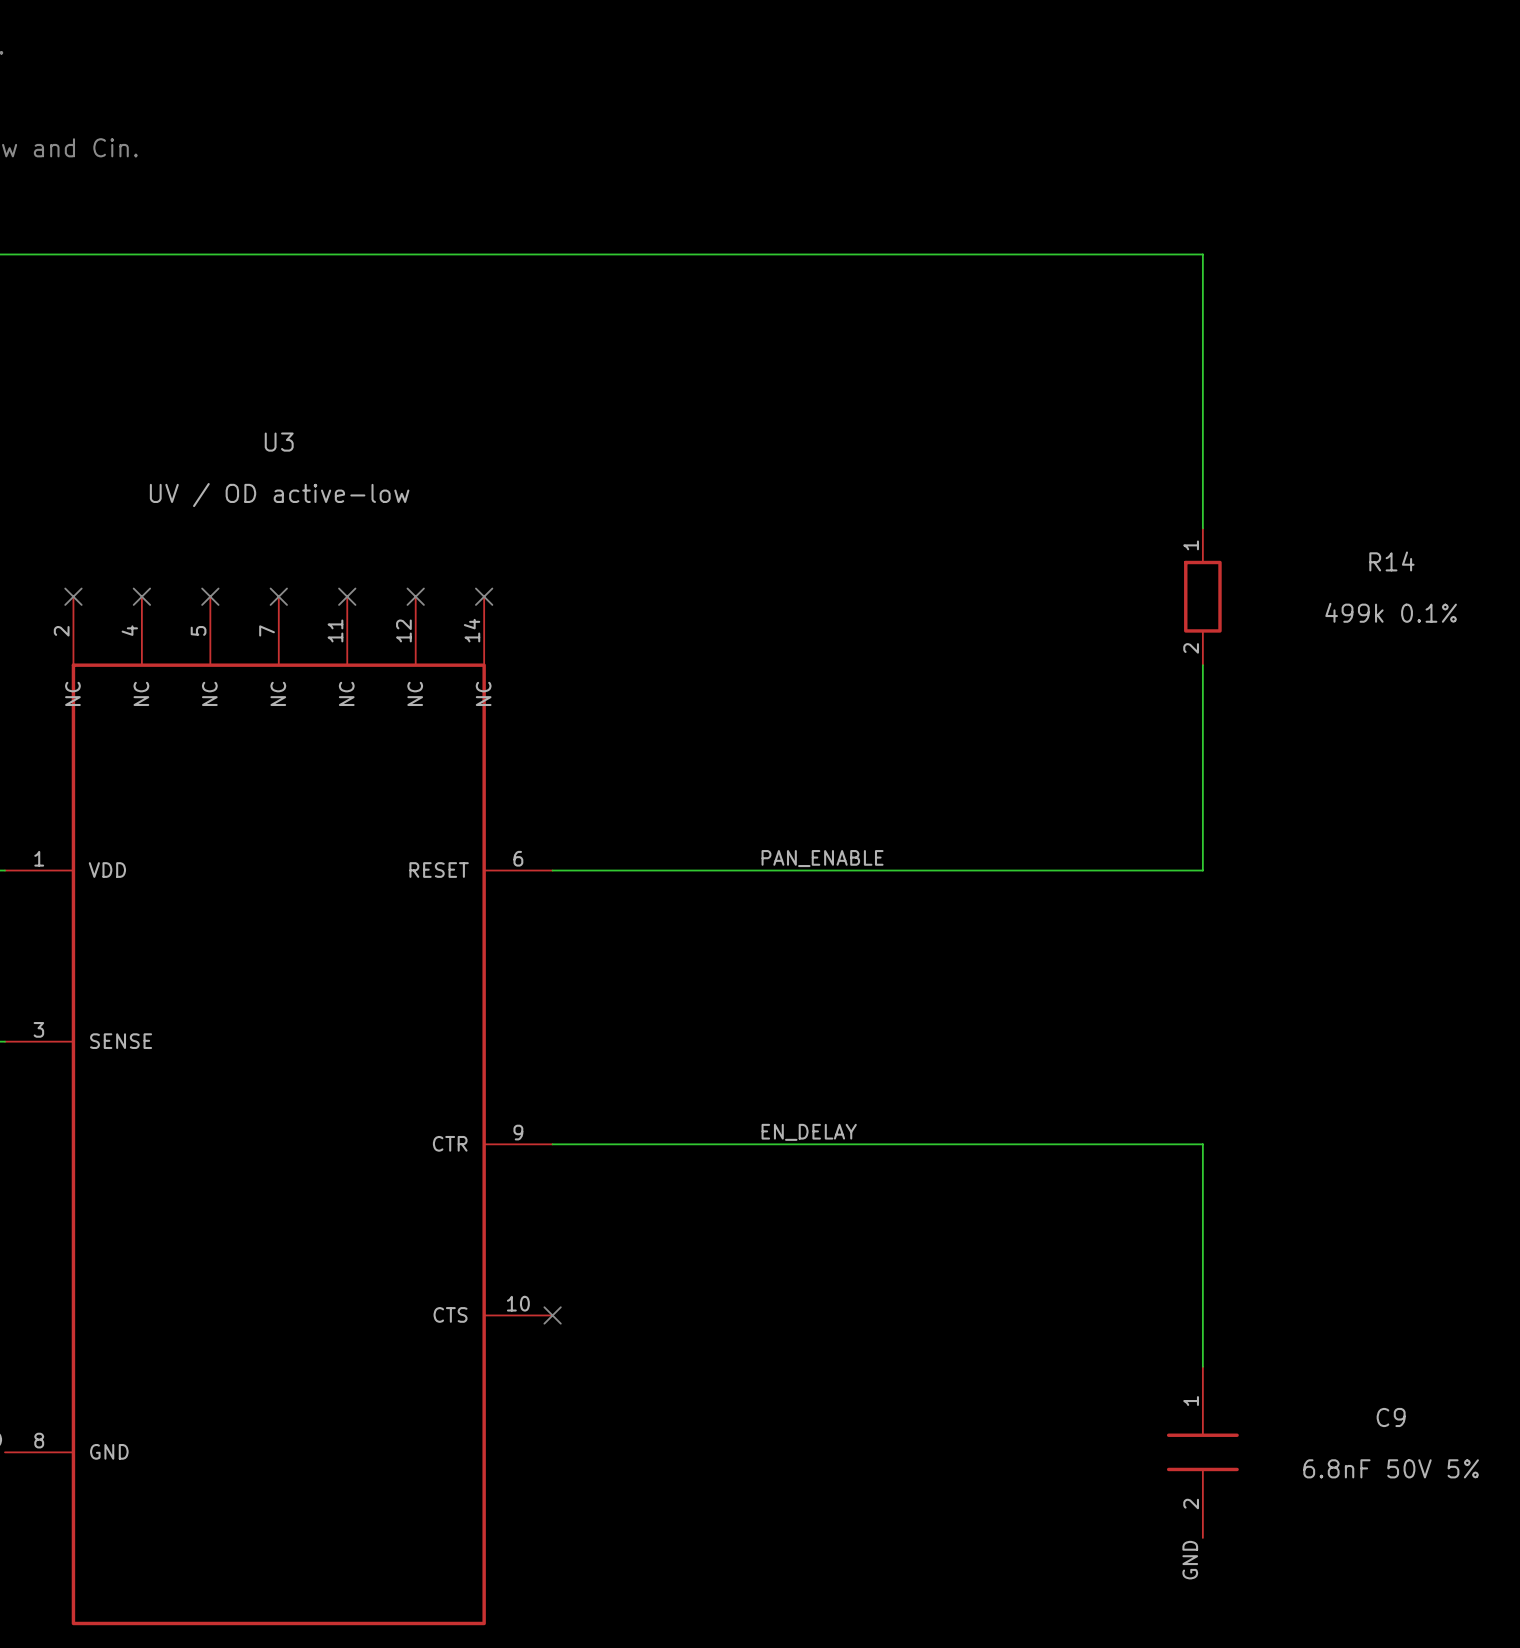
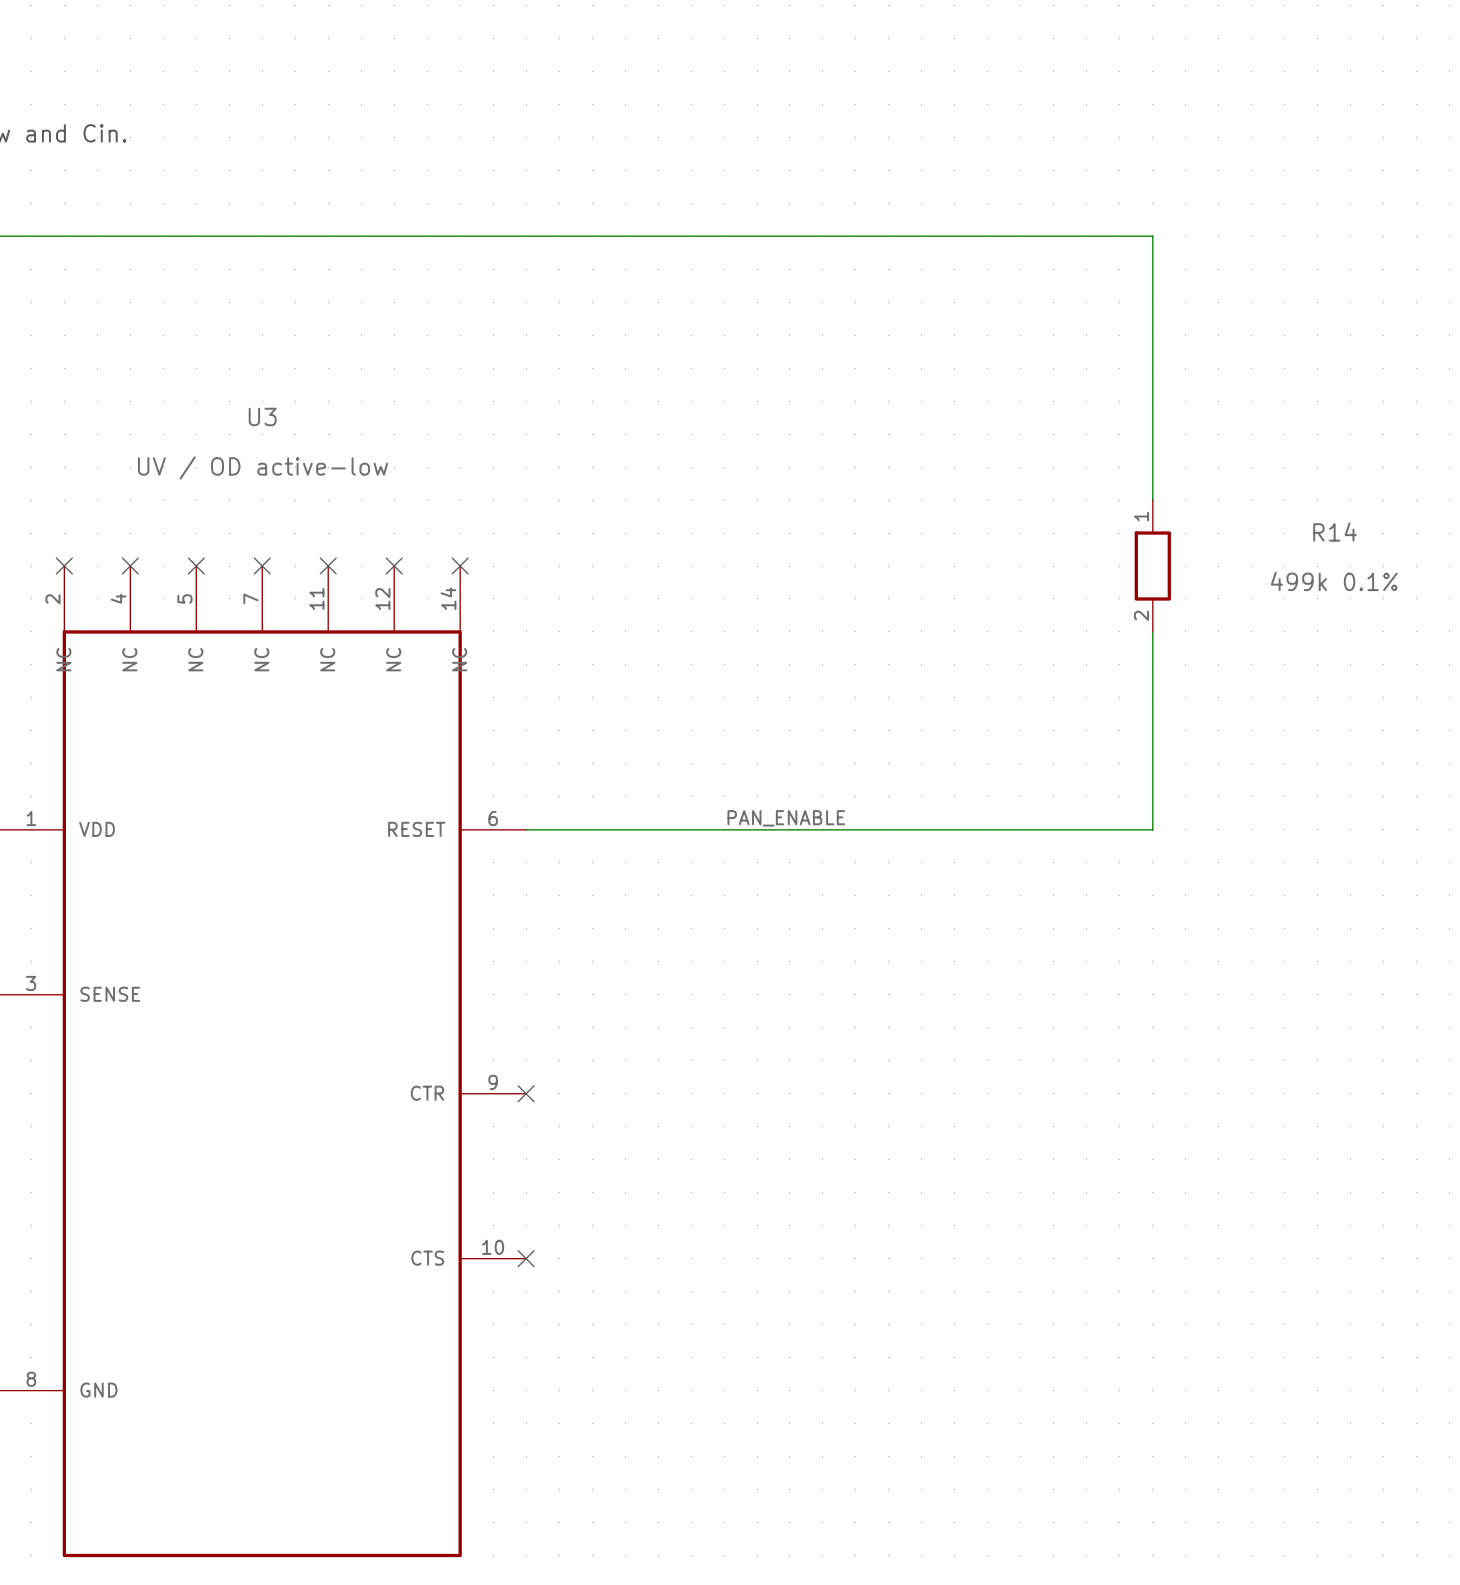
label: EN_DELAY (809, 1132) -> none
wire: (552, 1144) (1202, 1144) (1202, 1366) -> none
no-connect mark: none -> (526, 1093)
C9: 6.8nF 50V 5% (1202, 1452) -> none
label: GND (1190, 1560) -> none

